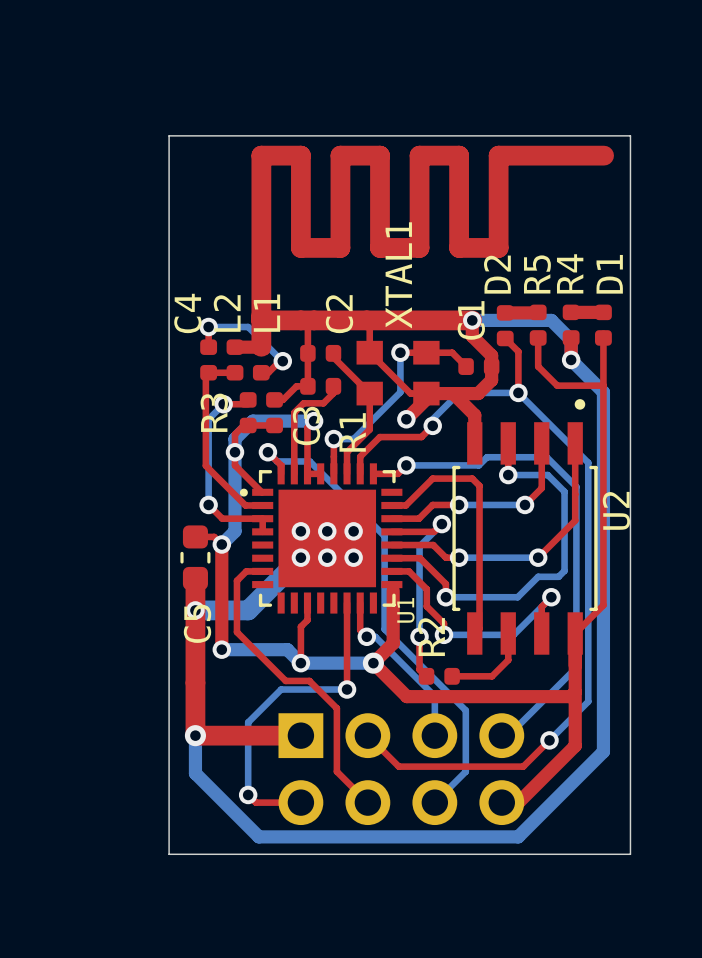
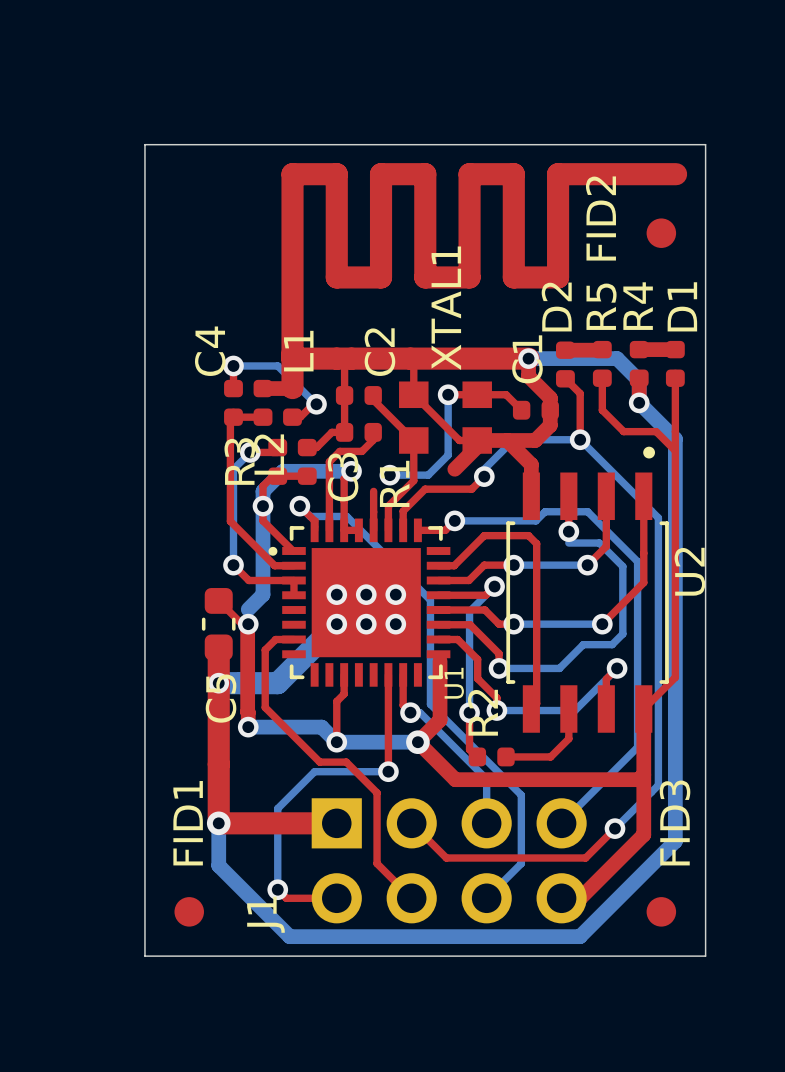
board edge: (630, 135) (169, 135) (169, 854) -> (705, 152) (705, 144) (144, 144) (144, 956) (189, 956)
FID2: none -> (661, 233)
L2 name position: L2 (227, 313) -> L2 (269, 454)
top track: (586, 385) (603, 385) -> (656, 431) (675, 450)
bottom track: (400, 392) (353, 439) (333, 439) -> (448, 439) (448, 455) (428, 475) (389, 475)
via: (406, 419) -> none
via position: (333, 439) -> (389, 475)
bottom track: (525, 457) (546, 457) (576, 486) (576, 667) (501, 742) -> (587, 511) (637, 561) (637, 747) (561, 823)
bottom track: (508, 475) (547, 475) (564, 491) (564, 570) (558, 576) (538, 576) (517, 597) (499, 597) -> (568, 543) (599, 543) (622, 566) (622, 634) (612, 644) (583, 644) (559, 668)
top track: (195, 536) (214, 536) (221, 544) (221, 636) -> (218, 600) (241, 624) (248, 624) (248, 712)
via position: (221, 544) -> (248, 624)
FID1: none -> (189, 911)
FID3: none -> (661, 911)
J1 name: none -> J1 (265, 914)

